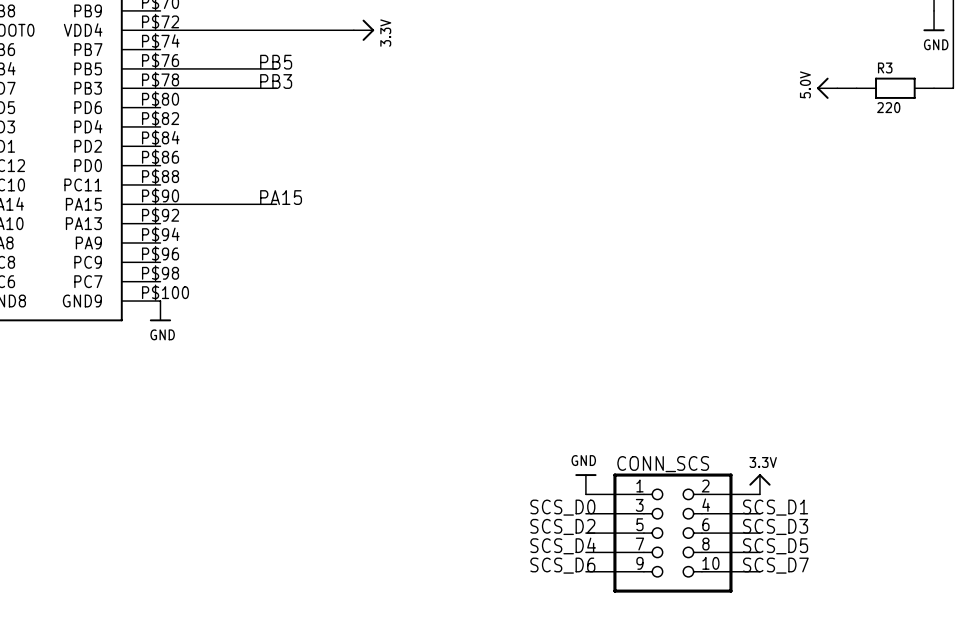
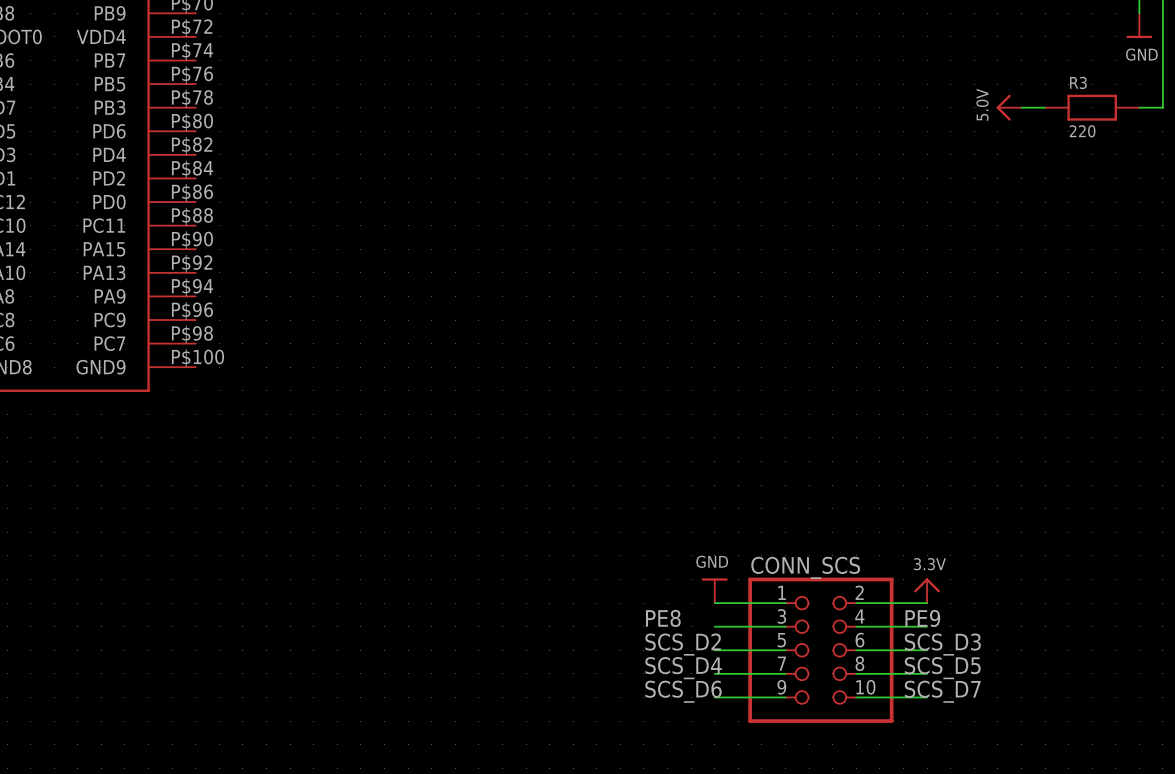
wire: (160, 30) (353, 30) -> none
power symbol: 3.3V (364, 30) -> none
label: PB5 (276, 62) -> none
wire: (160, 68) (276, 68) -> none
label: PB3 (276, 81) -> none
wire: (160, 88) (276, 88) -> none
label: PA15 (281, 197) -> none
wire: (160, 204) (276, 204) -> none
power symbol: GND (160, 311) -> none
label: SCS_D0 (562, 507) -> PE8 (663, 618)
label: SCS_D1 (775, 507) -> PE9 (922, 618)

